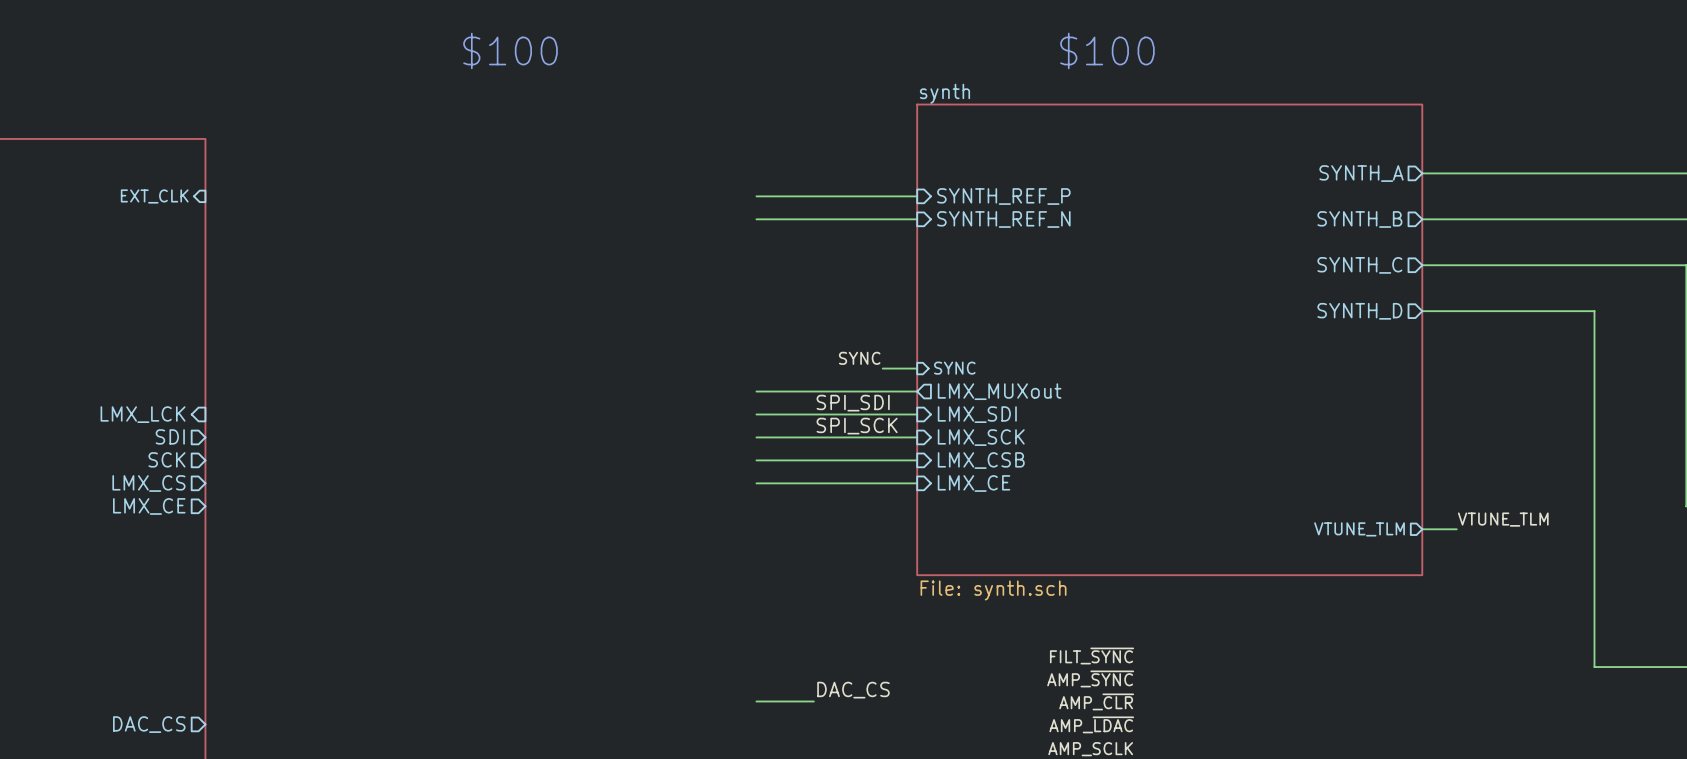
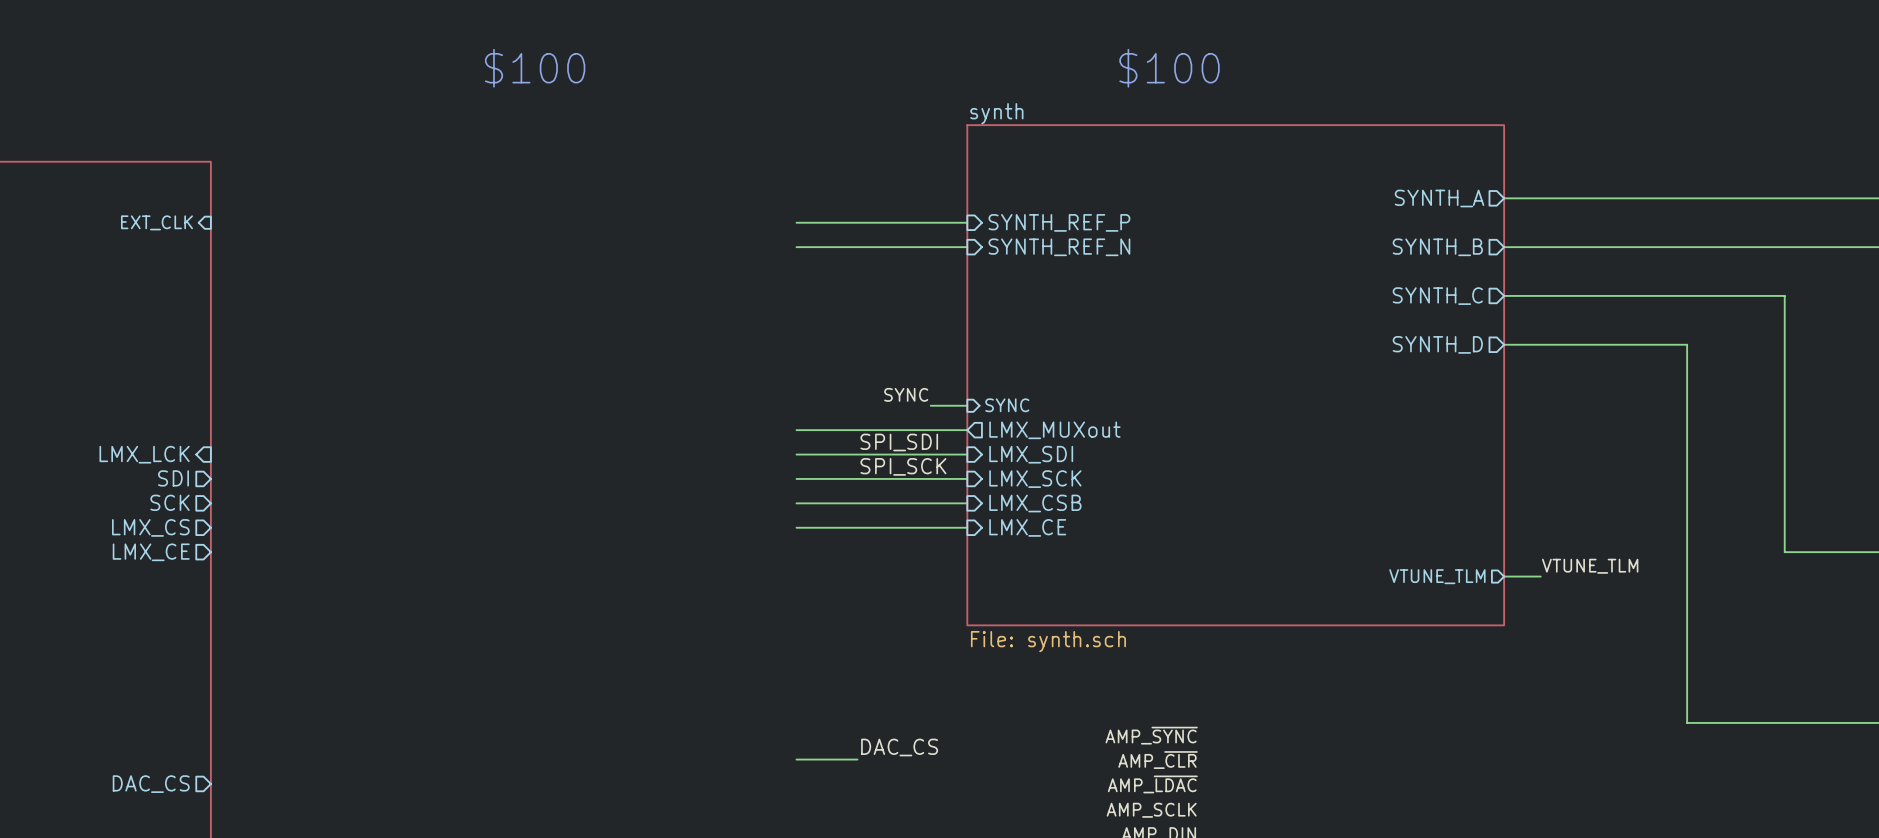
label: FILT_~{SYNC} (1092, 656) -> none

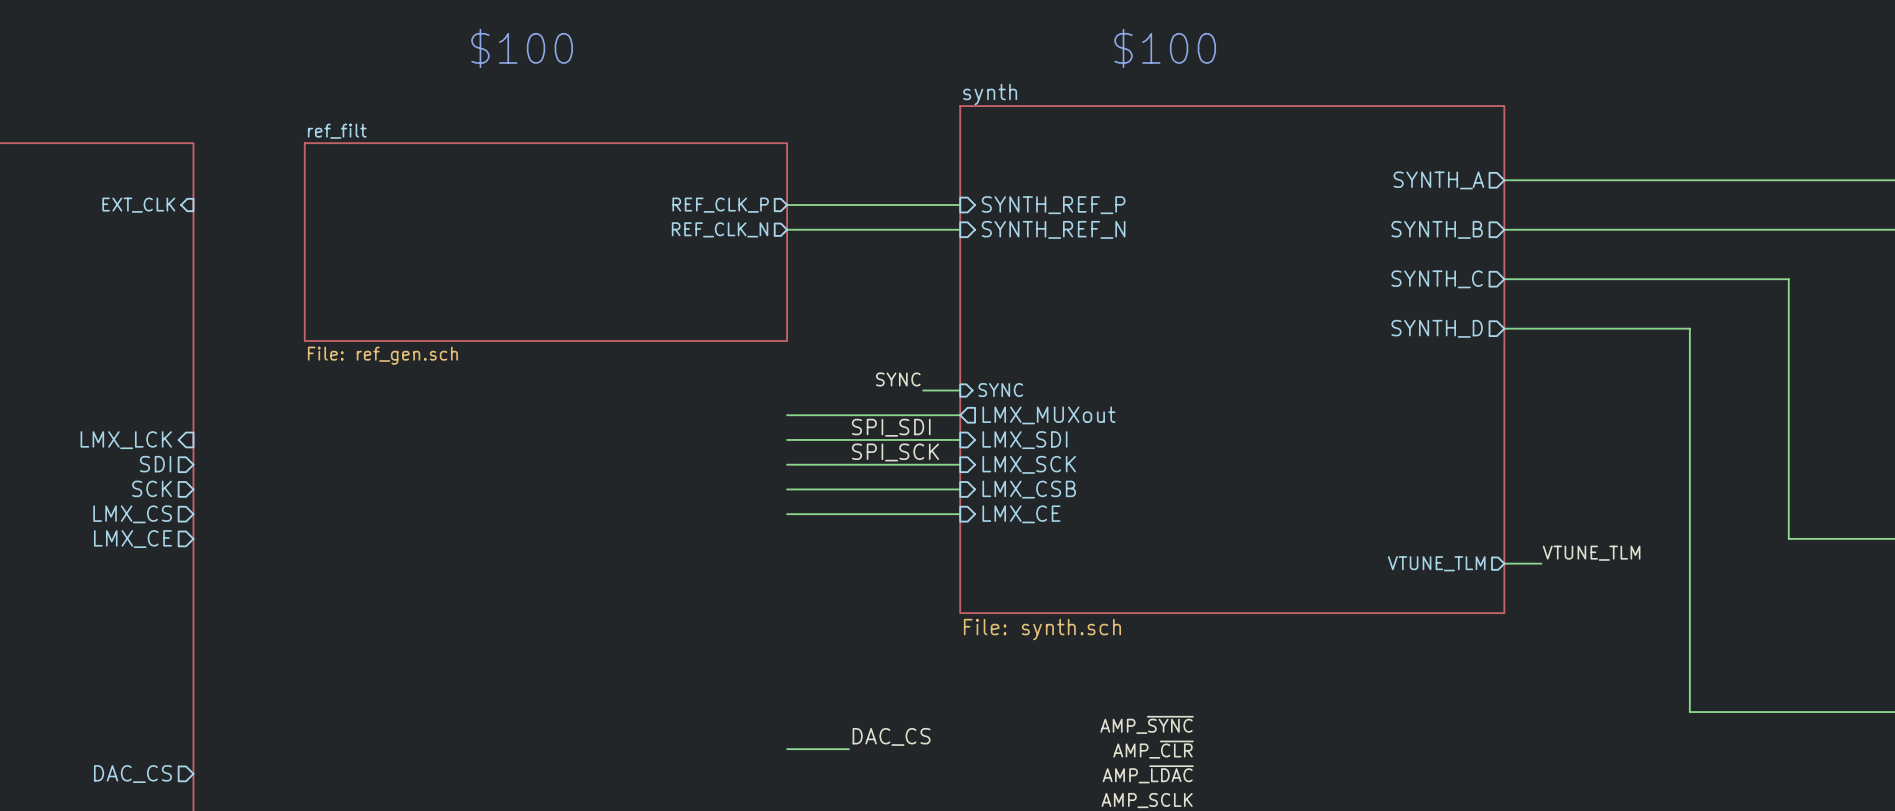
sheet pin: none -> REF_CLK_P (720, 205)
sheet pin: none -> REF_CLK_N (720, 229)
sheet ref_filt: none -> File: ref_gen.sch (545, 242)

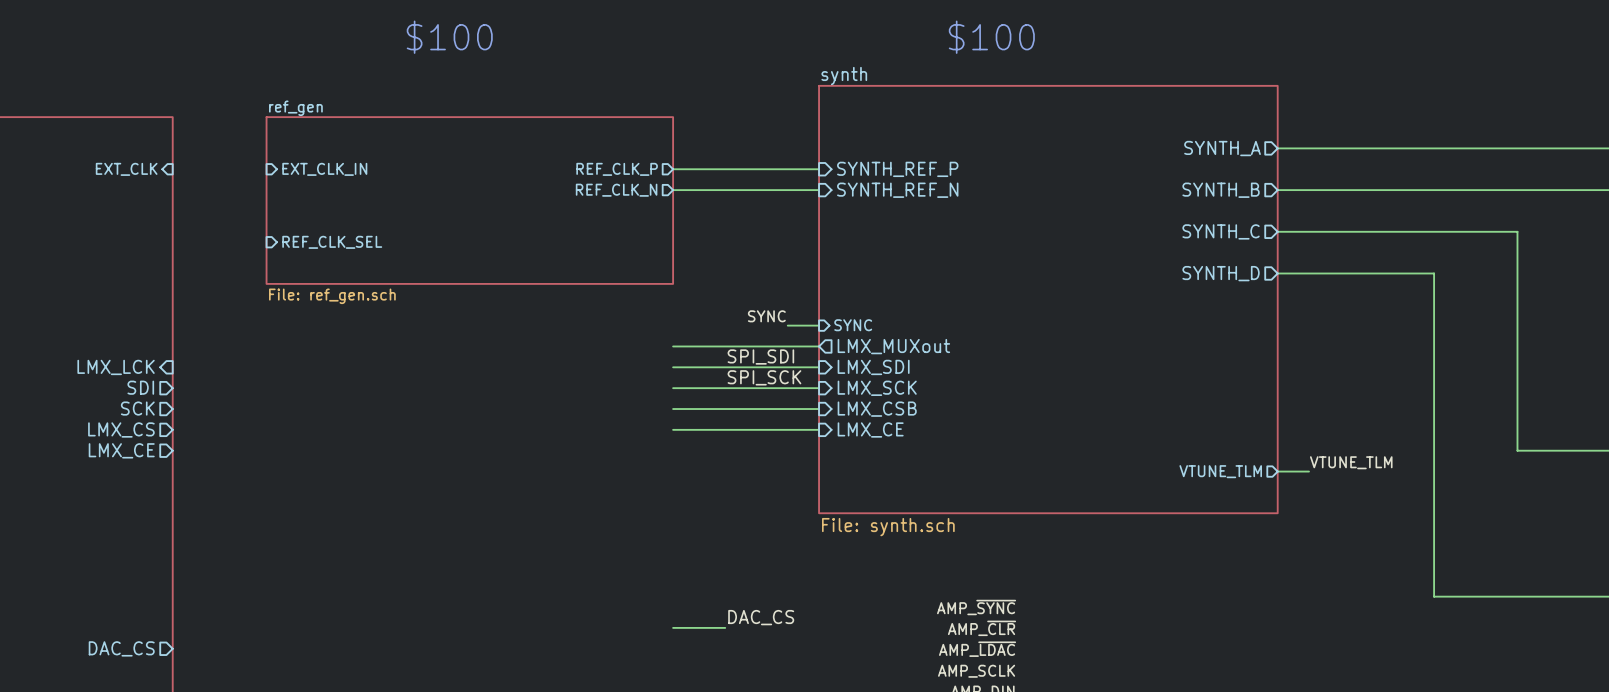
sheet ref_filt name: ref_filt (337, 131) -> ref_gen (295, 108)
sheet pin: none -> EXT_CLK_IN (324, 169)
sheet pin: none -> REF_CLK_SEL (332, 242)

